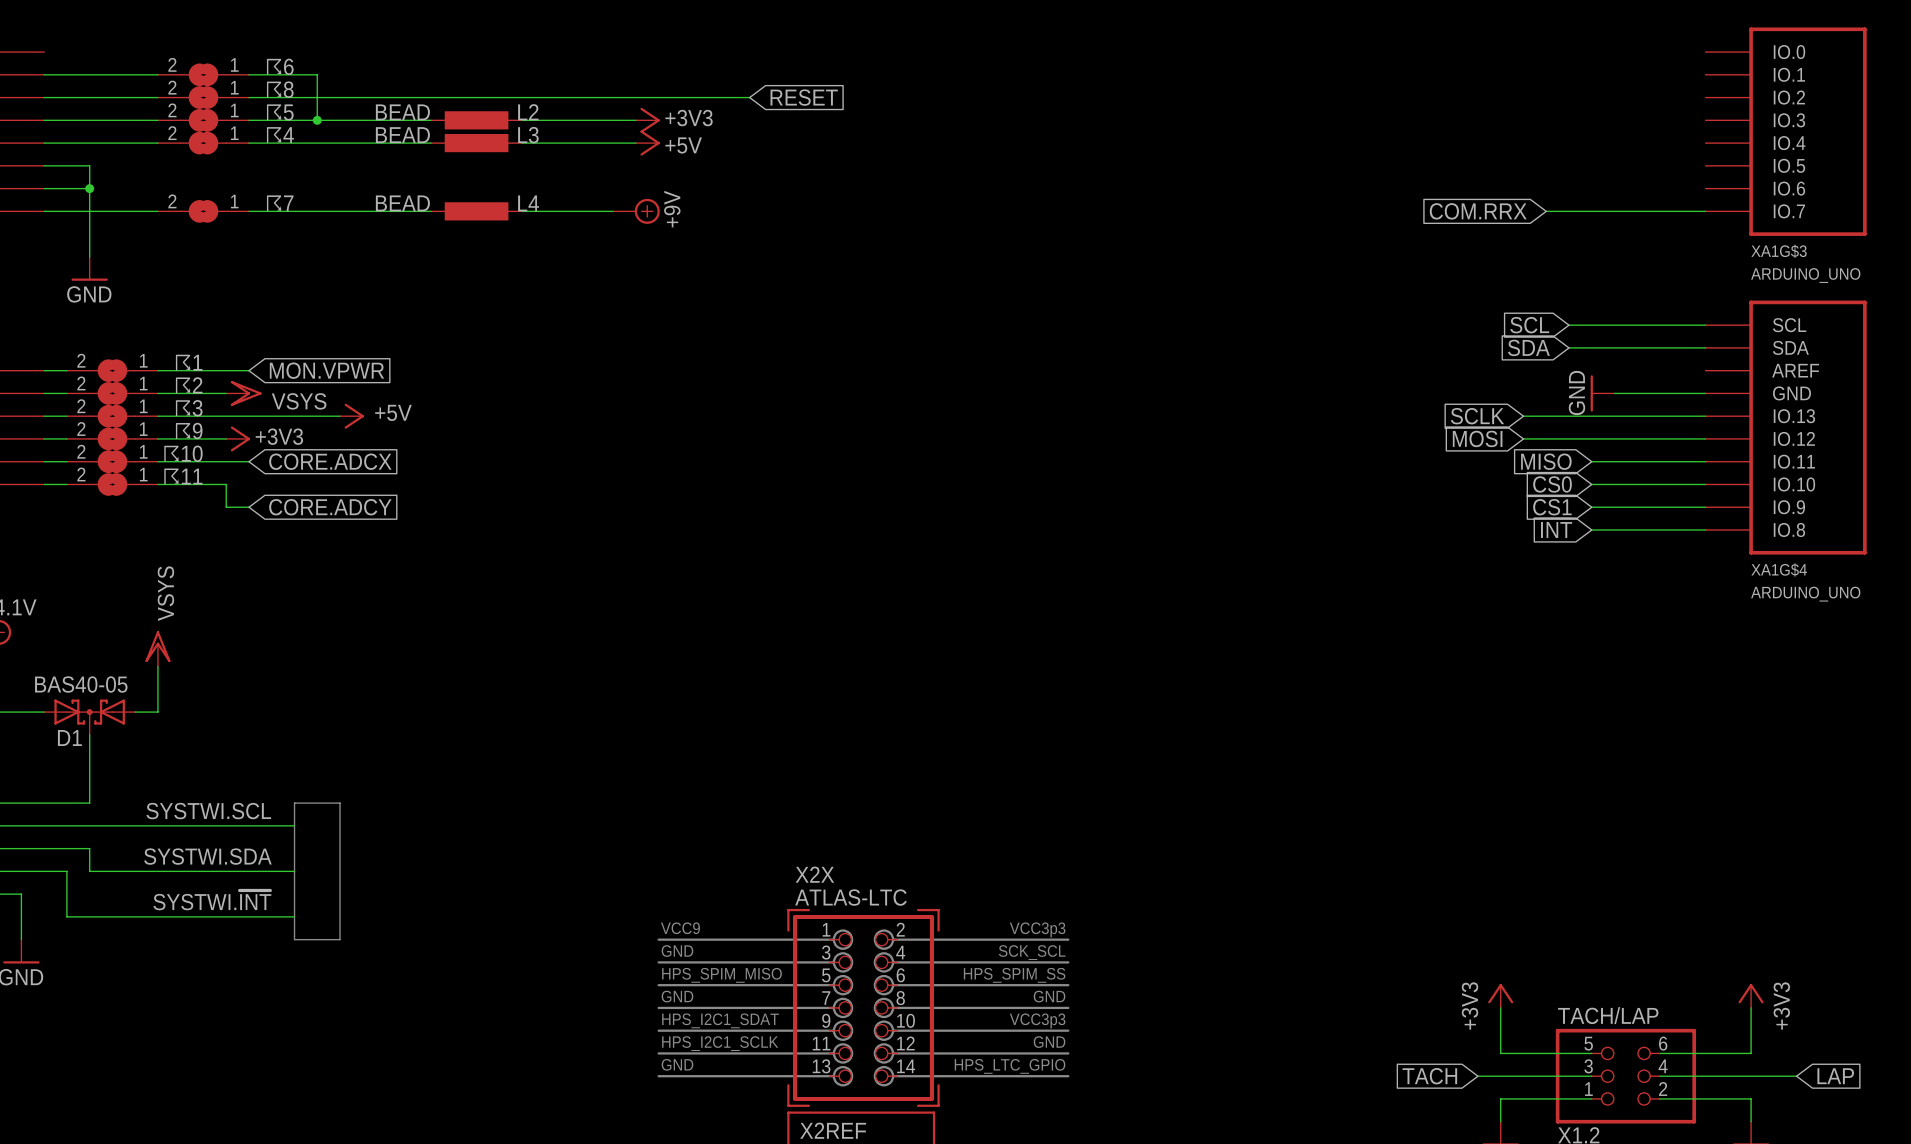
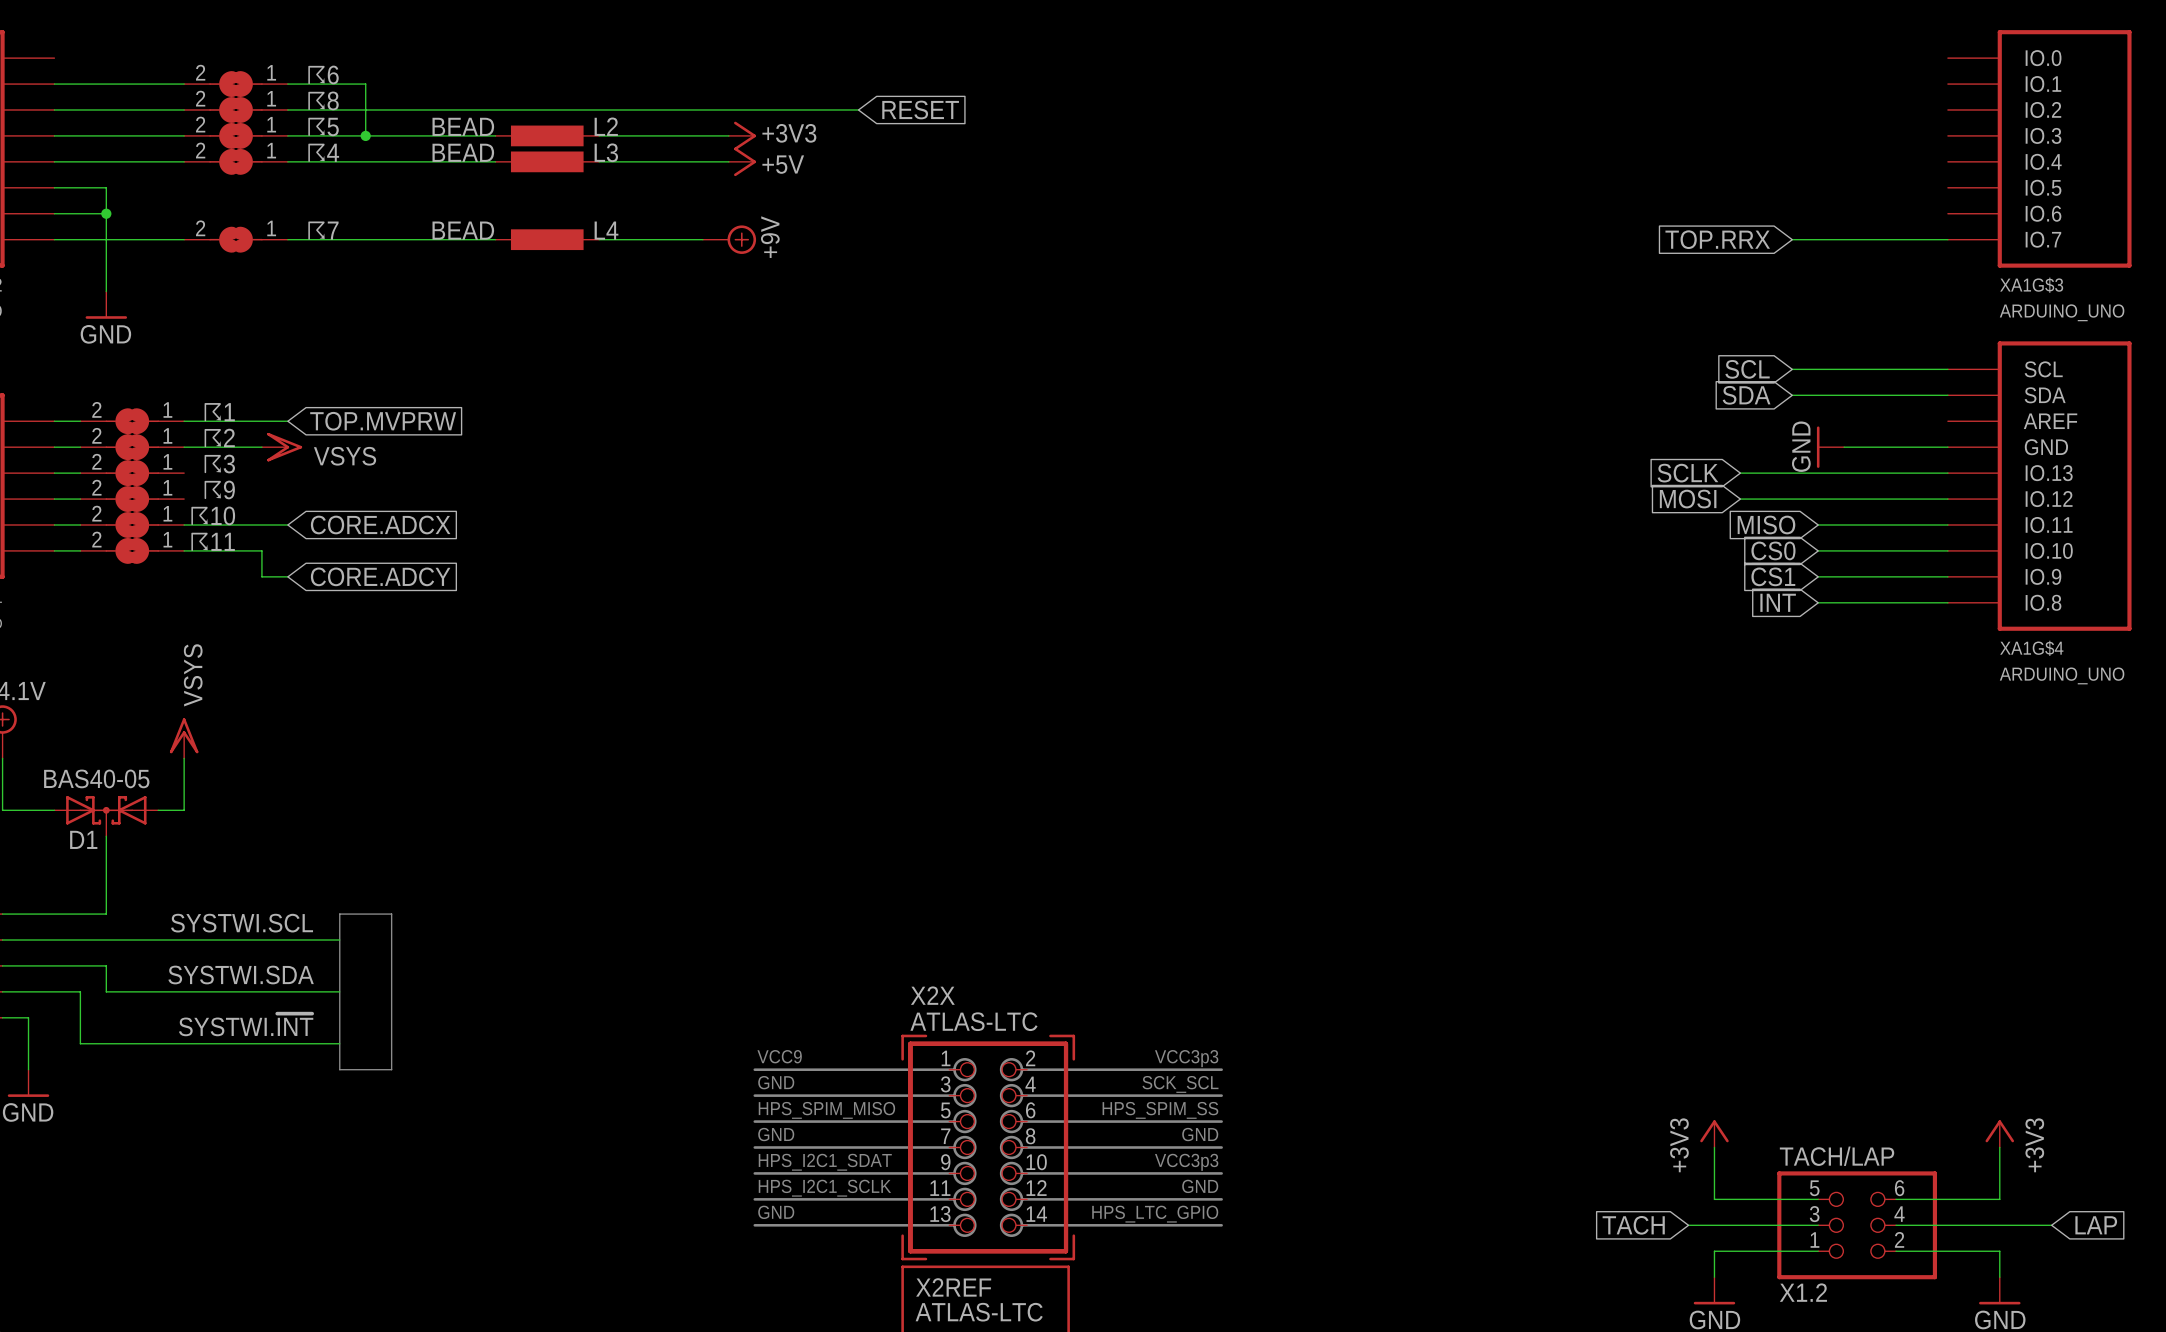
global label: COM.RRX (1478, 211) -> TOP.RRX (1717, 239)
wire: (1546, 211) (1569, 211) -> none
global label: MON.VPWR (326, 370) -> TOP.MVPRW (383, 421)
wire: (157, 416) (340, 416) -> none
power symbol: +5V (351, 416) -> none
wire: (157, 438) (226, 438) -> none
power symbol: +3V3 (238, 438) -> none

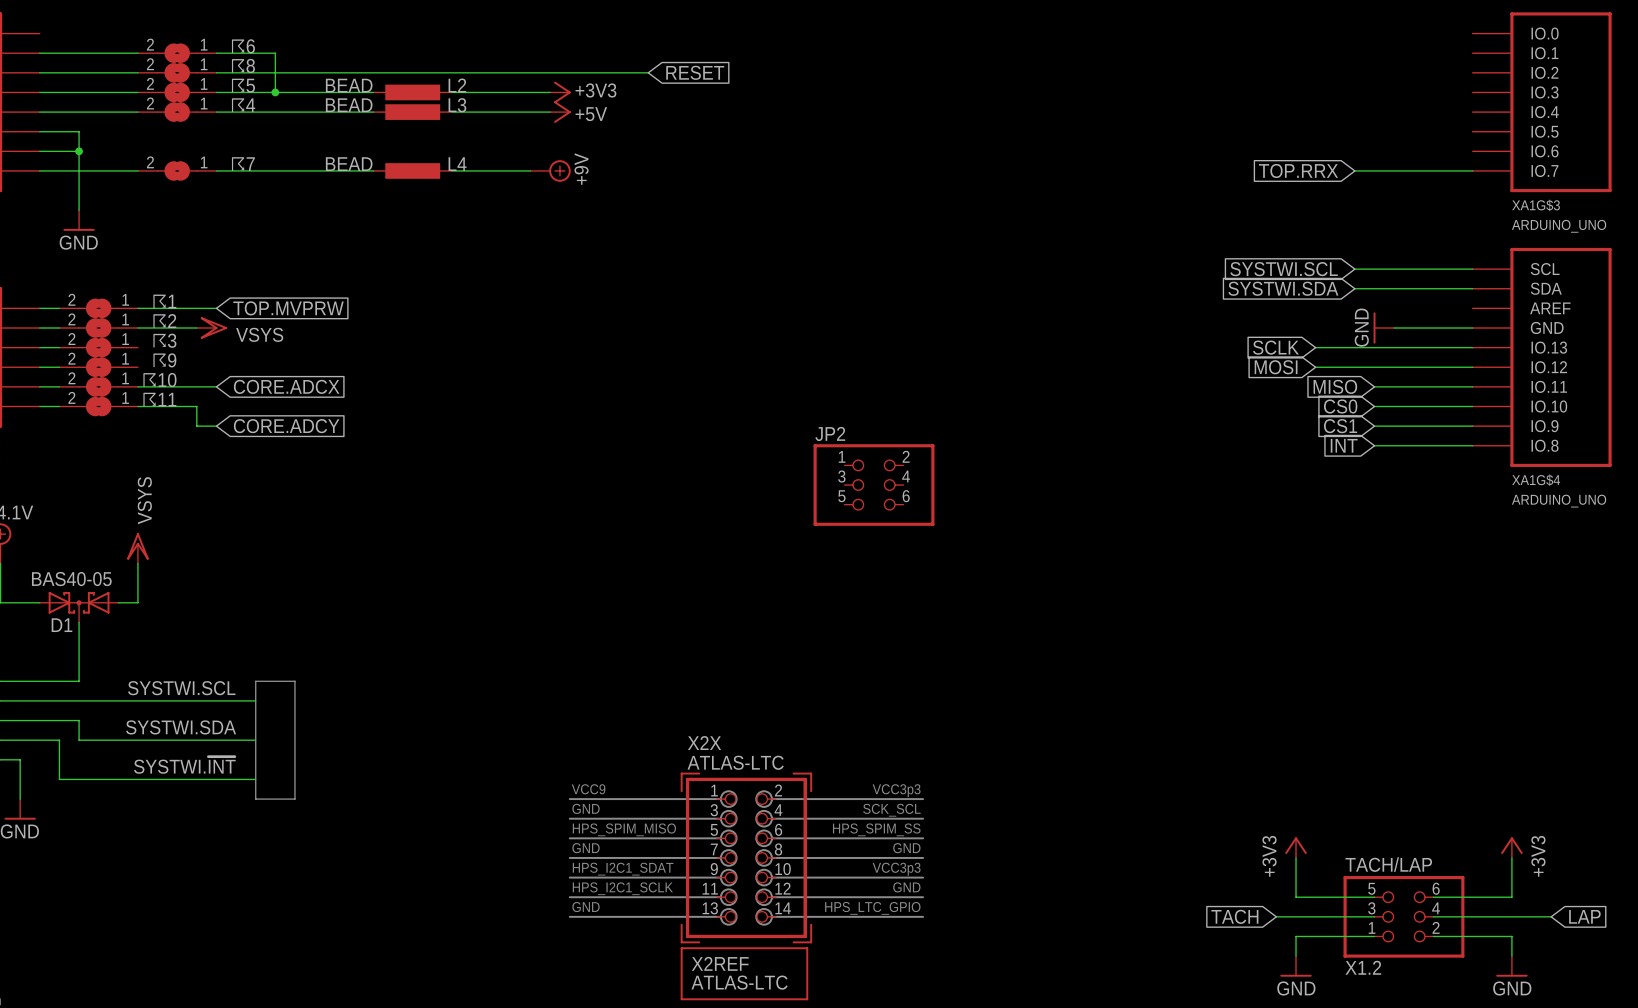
global label: SCL (1747, 369) -> SYSTWI.SCL (1284, 269)
global label: SDA (1746, 395) -> SYSTWI.SDA (1283, 288)
JP2: none -> (874, 485)

